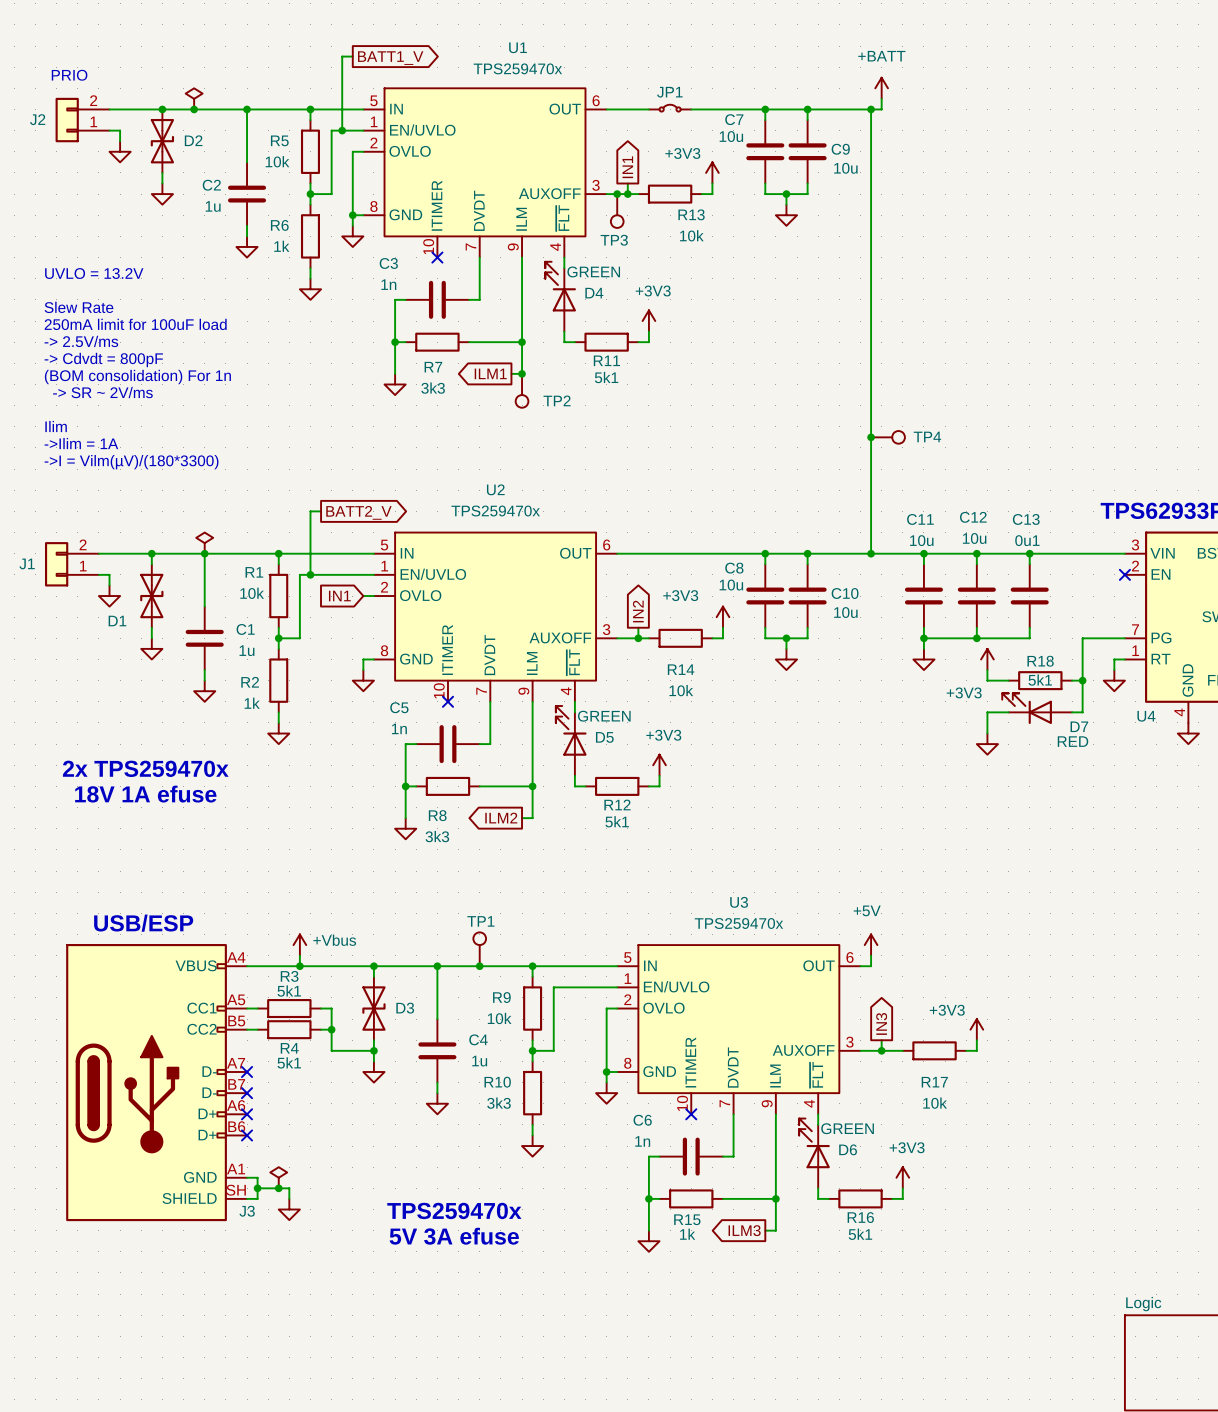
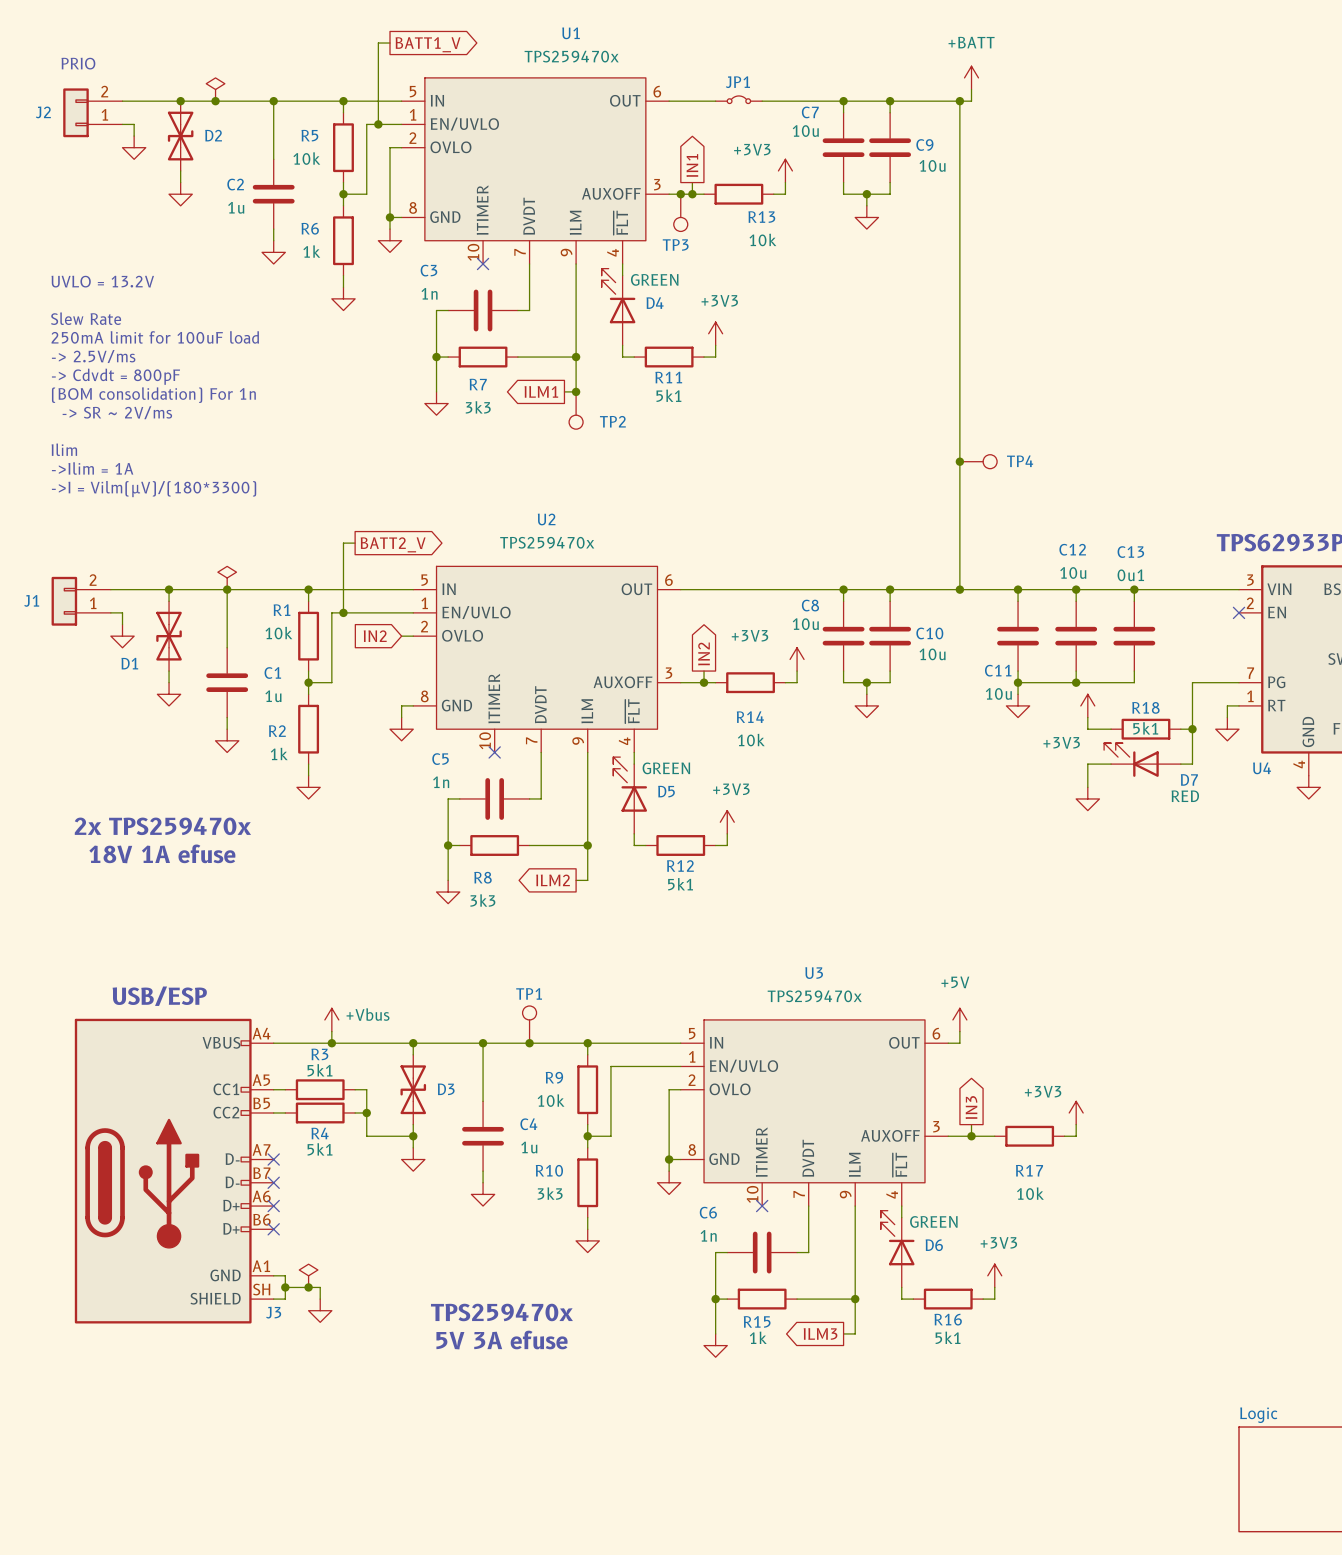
C11 name position: C11 (920, 519) -> C11 (998, 670)
C11 value position: 10u (921, 540) -> 10u (998, 693)
global label: IN1 (339, 596) -> IN2 (375, 636)

